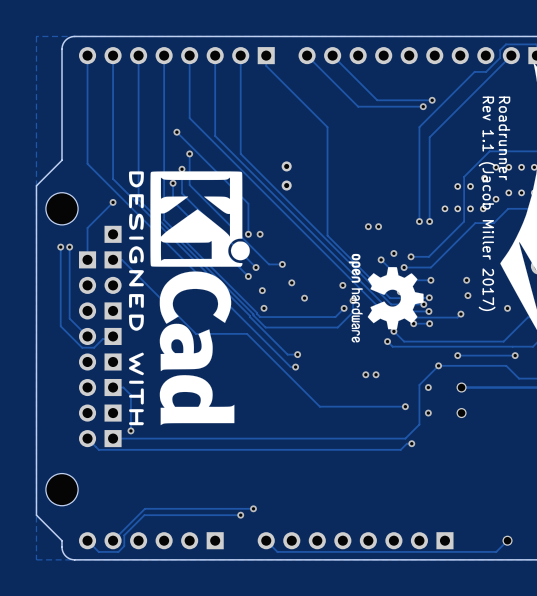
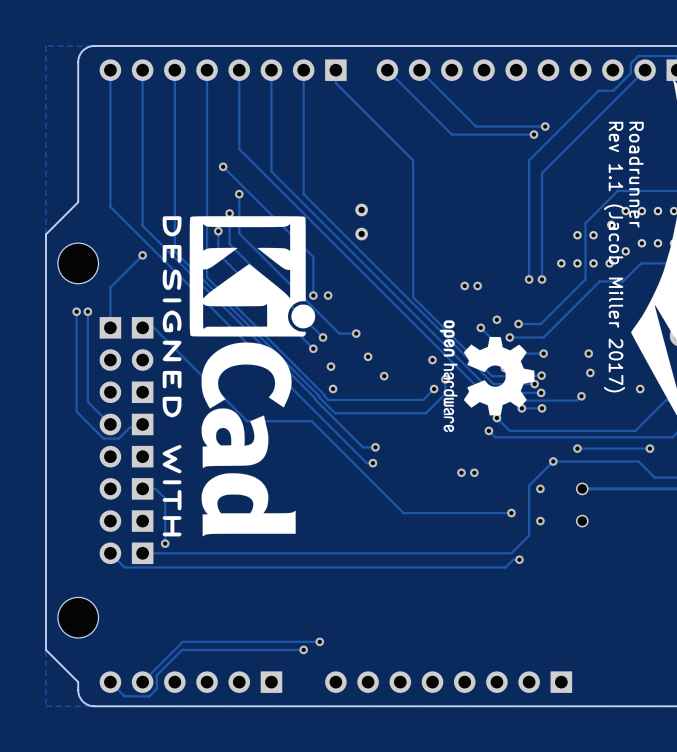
part: (113, 234) -> none
track: (507, 540) (496, 551) (277, 551) (266, 540) -> none
part: (507, 540) -> none

